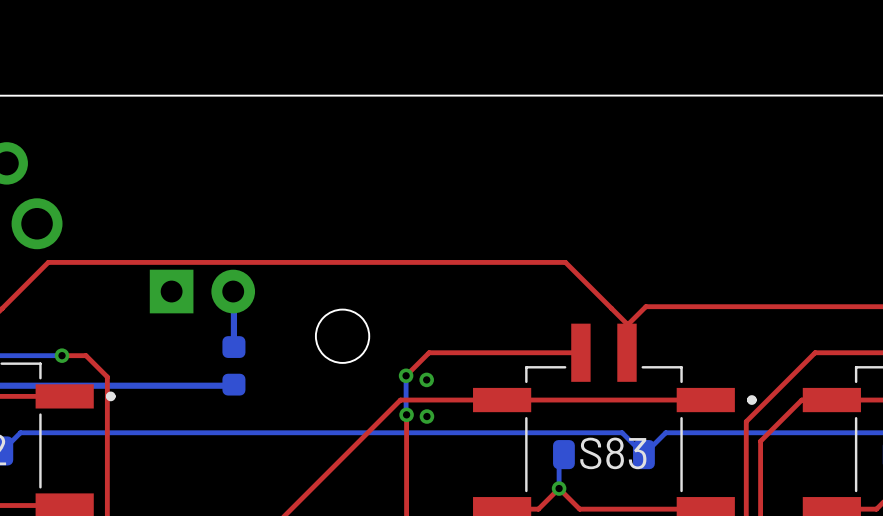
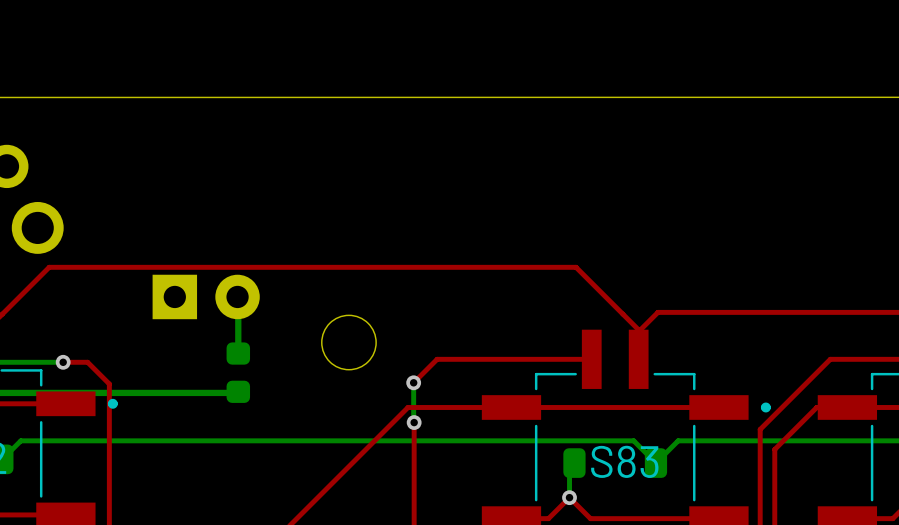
via: (426, 379) -> none
via: (426, 416) -> none

